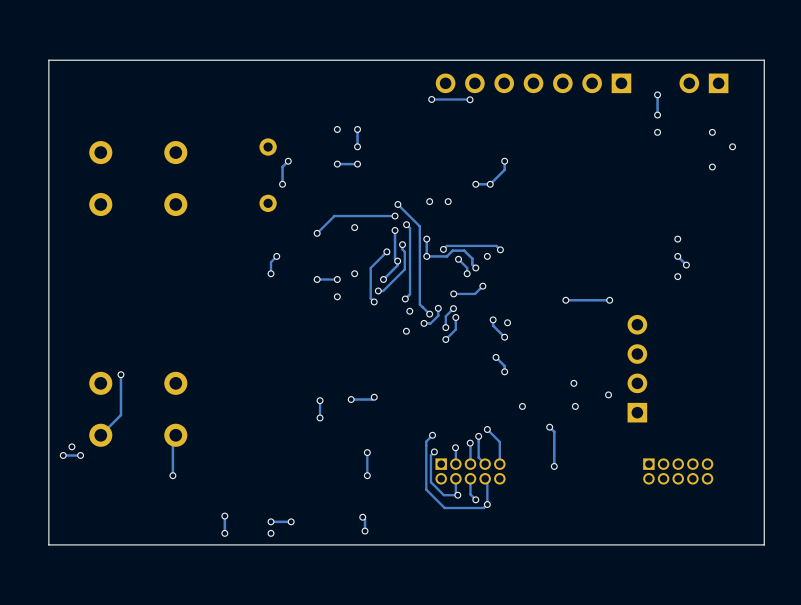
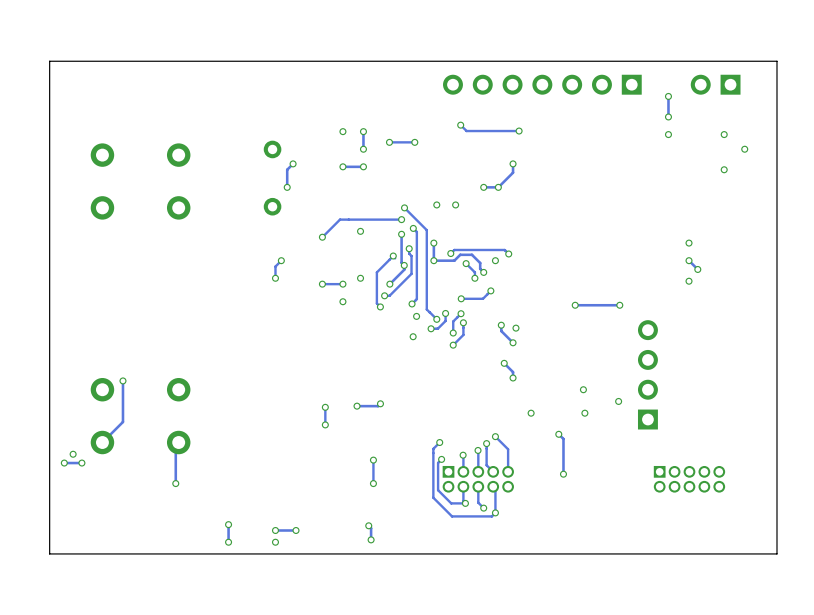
track: (431, 99) (470, 99) -> none
via: (431, 99) -> none
via: (470, 99) -> none
track: none -> (460, 125) (466, 131) (519, 131)
via: none -> (460, 125)
via: none -> (519, 131)
via: none -> (389, 142)
track: none -> (414, 142) (389, 142)
via: none -> (414, 142)

